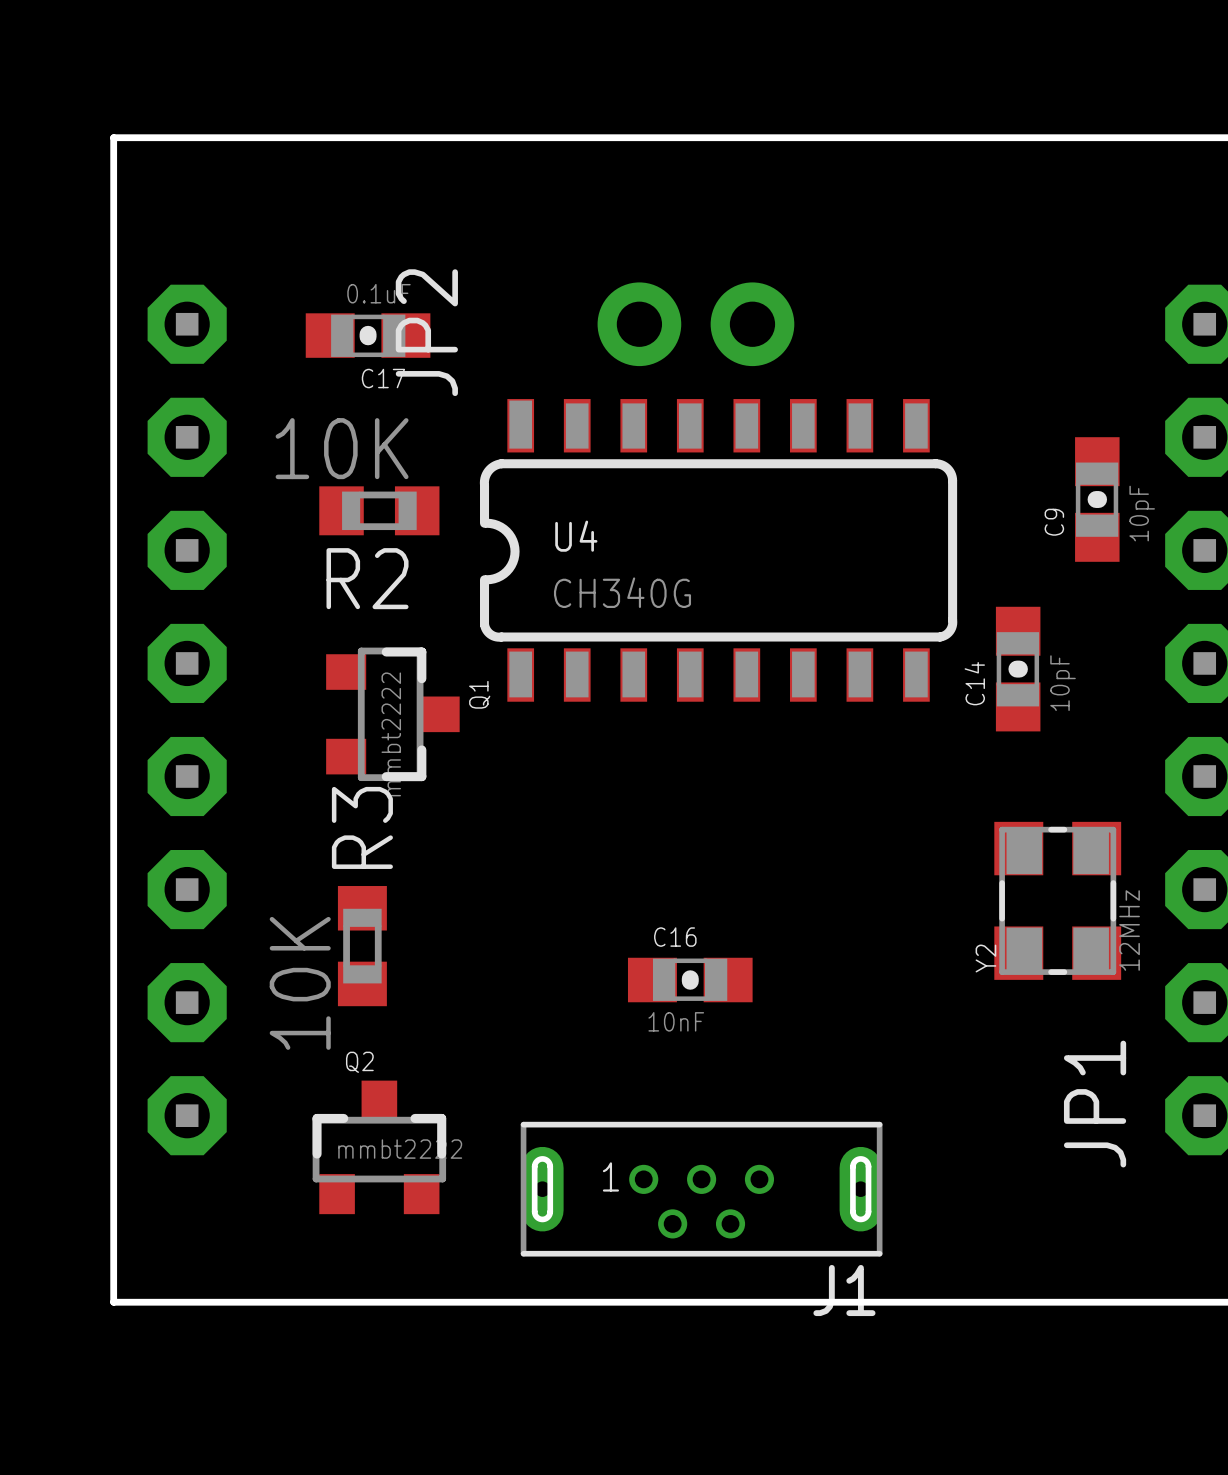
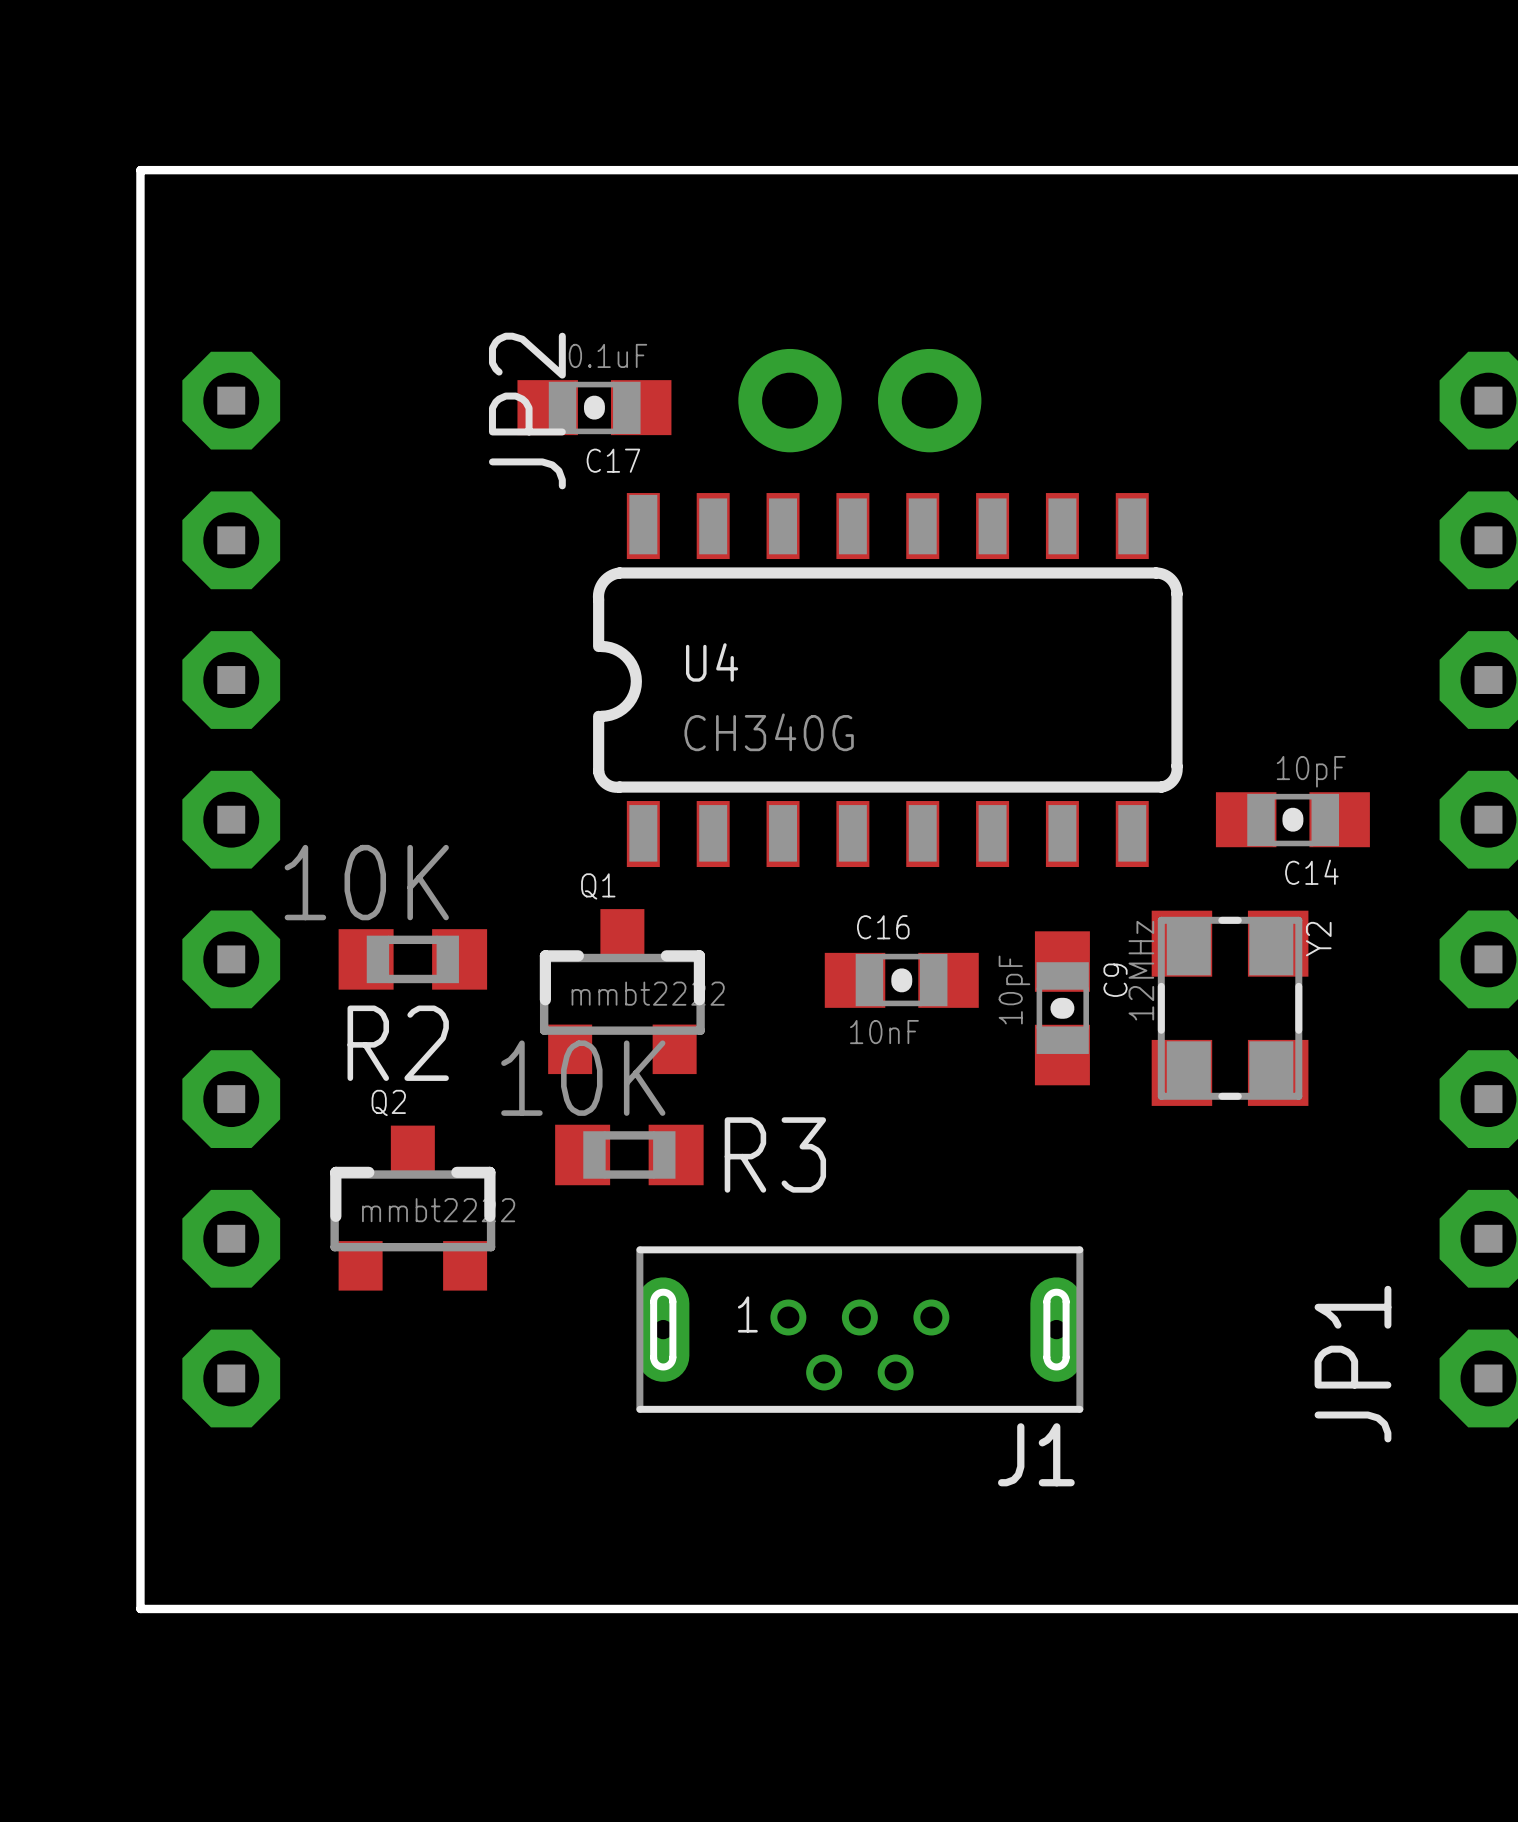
C17 position: (368, 335) -> (594, 407)
C9 position: (1097, 499) -> (1062, 1008)
R2 position: (379, 510) -> (412, 959)
C9 value position: 10pF (1142, 513) -> 10pF (1014, 990)
C9 name position: C9 (1054, 522) -> C9 (1115, 980)
C14 rotation: 0° (1018, 669) -> 90° clockwise (1292, 819)
Q1 rotation: 0° (392, 714) -> 90° counterclockwise (622, 991)
Q1 position: (392, 714) -> (622, 991)
Y2 position: (1057, 900) -> (1230, 1008)
Y2 value position: 12MHz (1129, 930) -> 12MHz (1141, 970)
R3 rotation: 0° (362, 946) -> 90° clockwise (629, 1154)
R3 position: (362, 946) -> (629, 1154)
Y2 name position: Y2 (985, 958) -> Y2 (1318, 939)
C16 position: (690, 980) -> (901, 980)
Q2 position: (379, 1147) -> (412, 1208)
J1 position: (701, 1189) -> (859, 1329)

